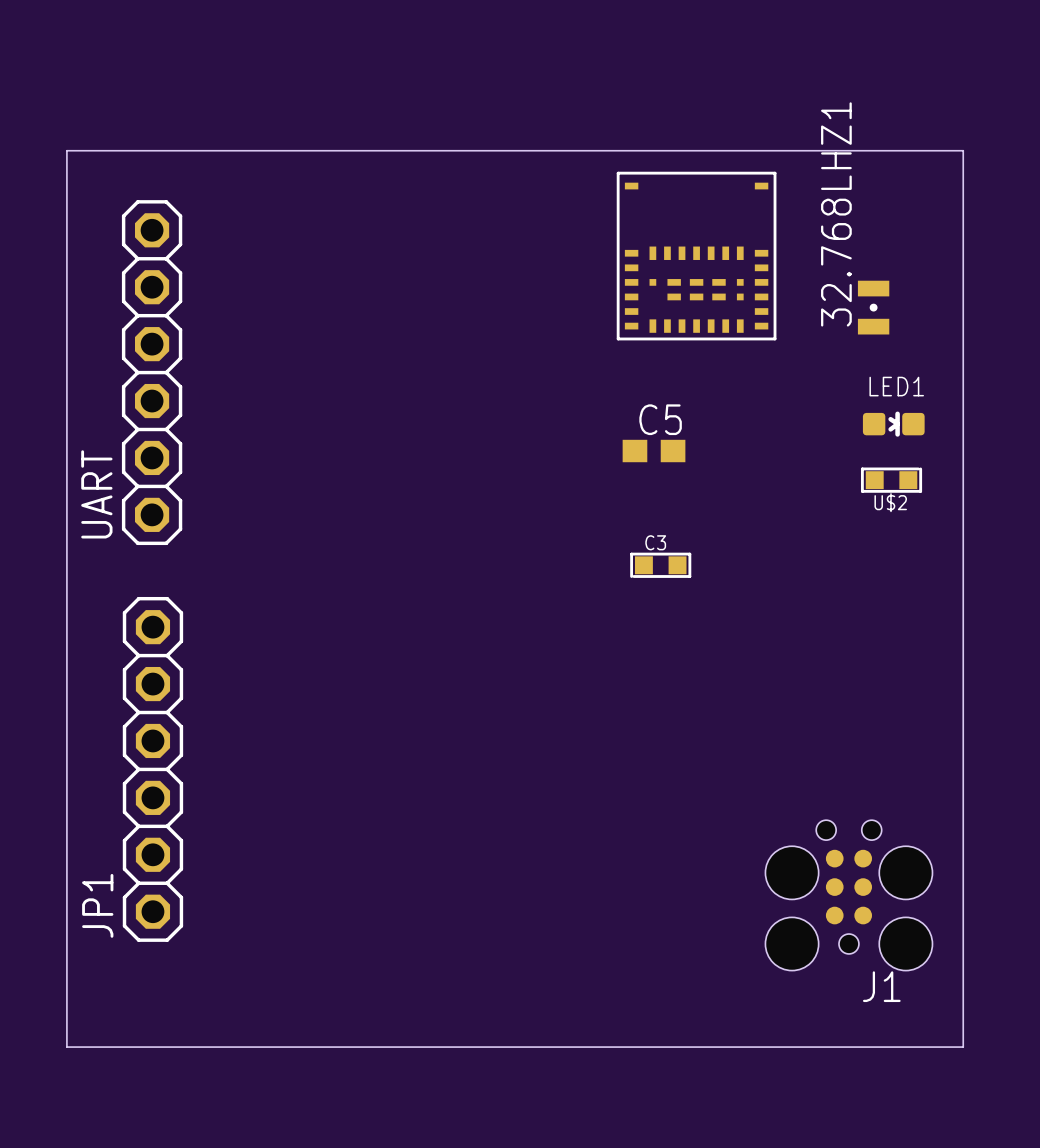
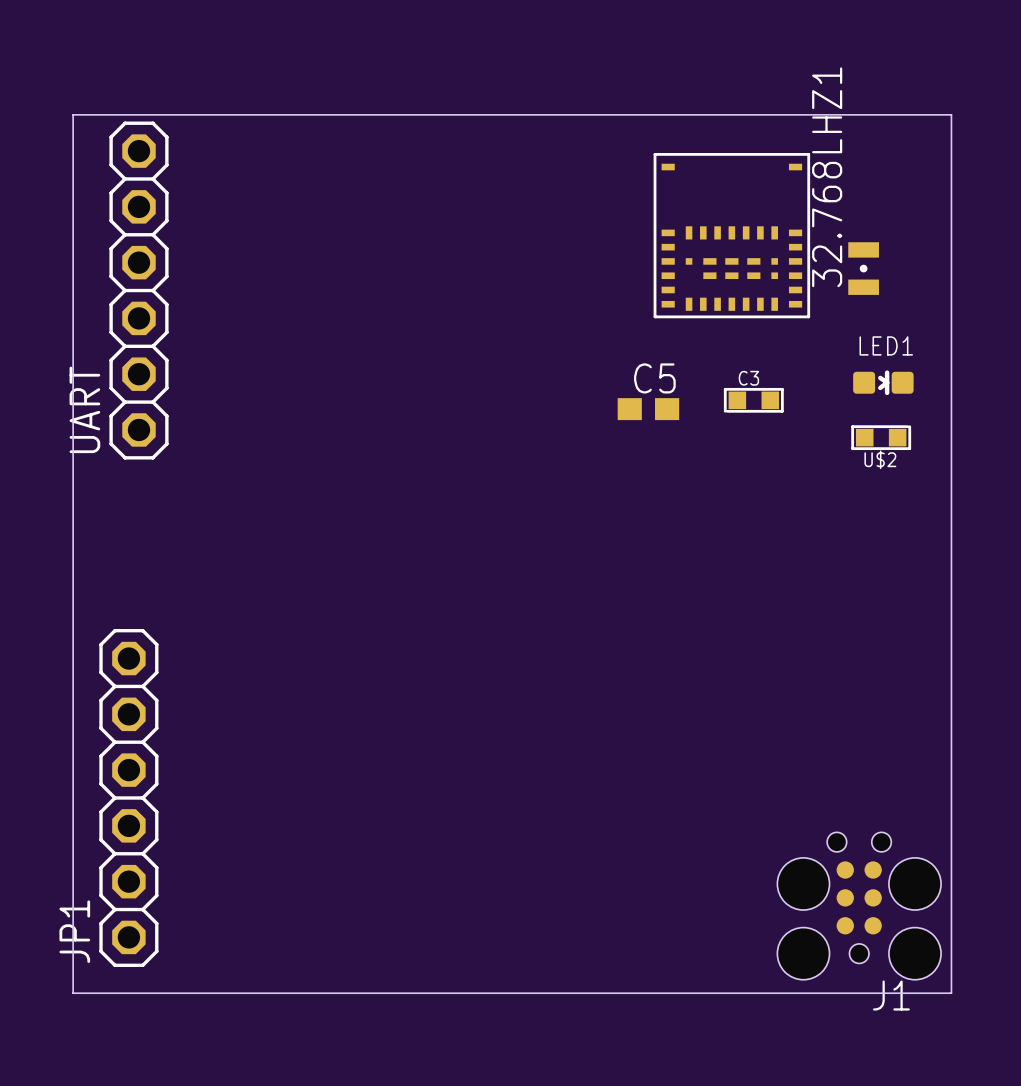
part position: (696, 256) -> (731, 235)
UART position: (152, 372) -> (138, 290)
C3 position: (660, 565) -> (753, 400)
JP1 position: (152, 769) -> (128, 797)
J1 position: (848, 895) -> (859, 906)

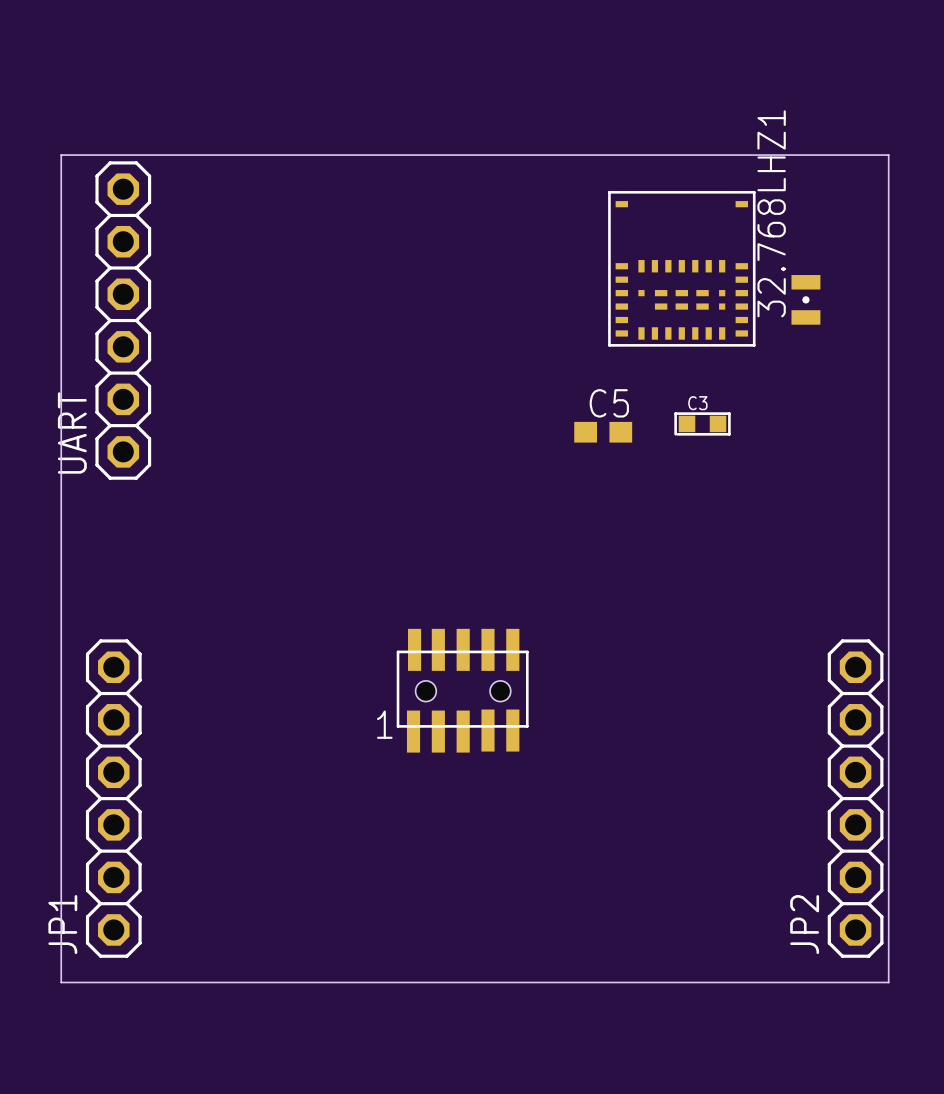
LED1: (883, 382) -> none
U$2: (881, 437) -> none
part: none -> (462, 690)
JP2: none -> (855, 798)
J1: (859, 906) -> none

